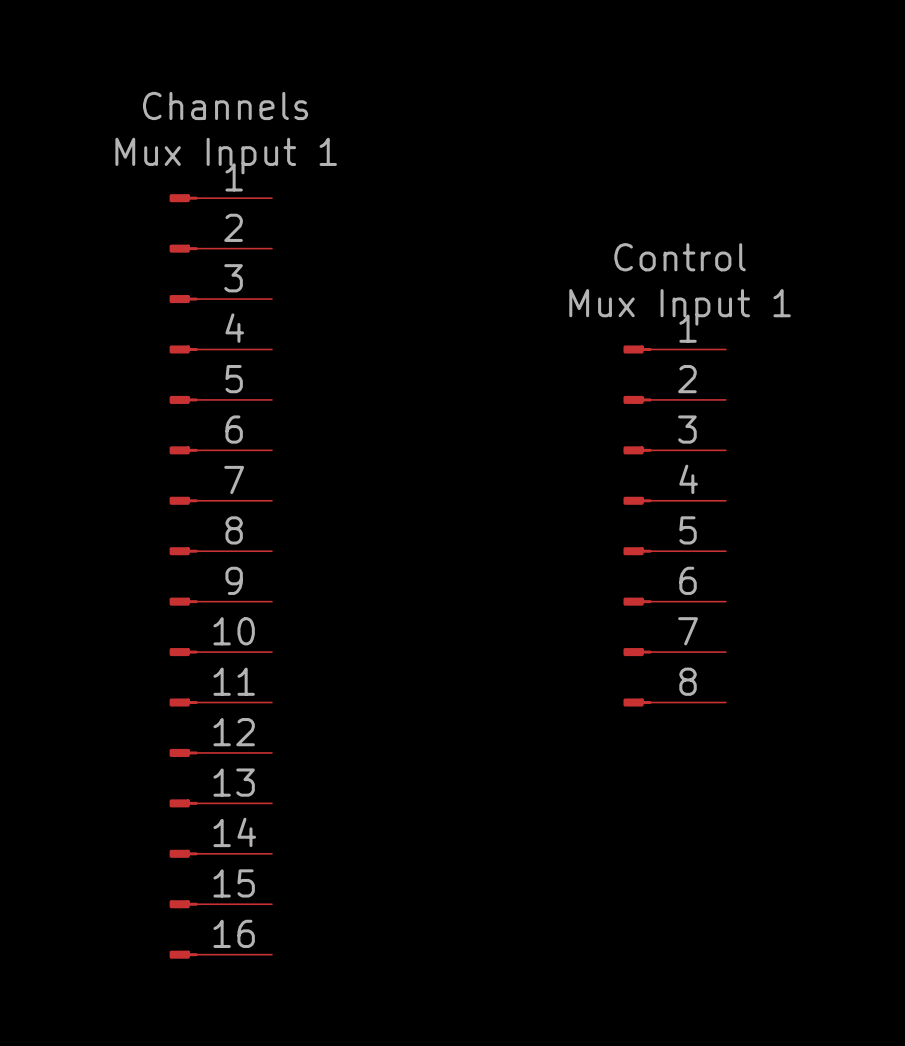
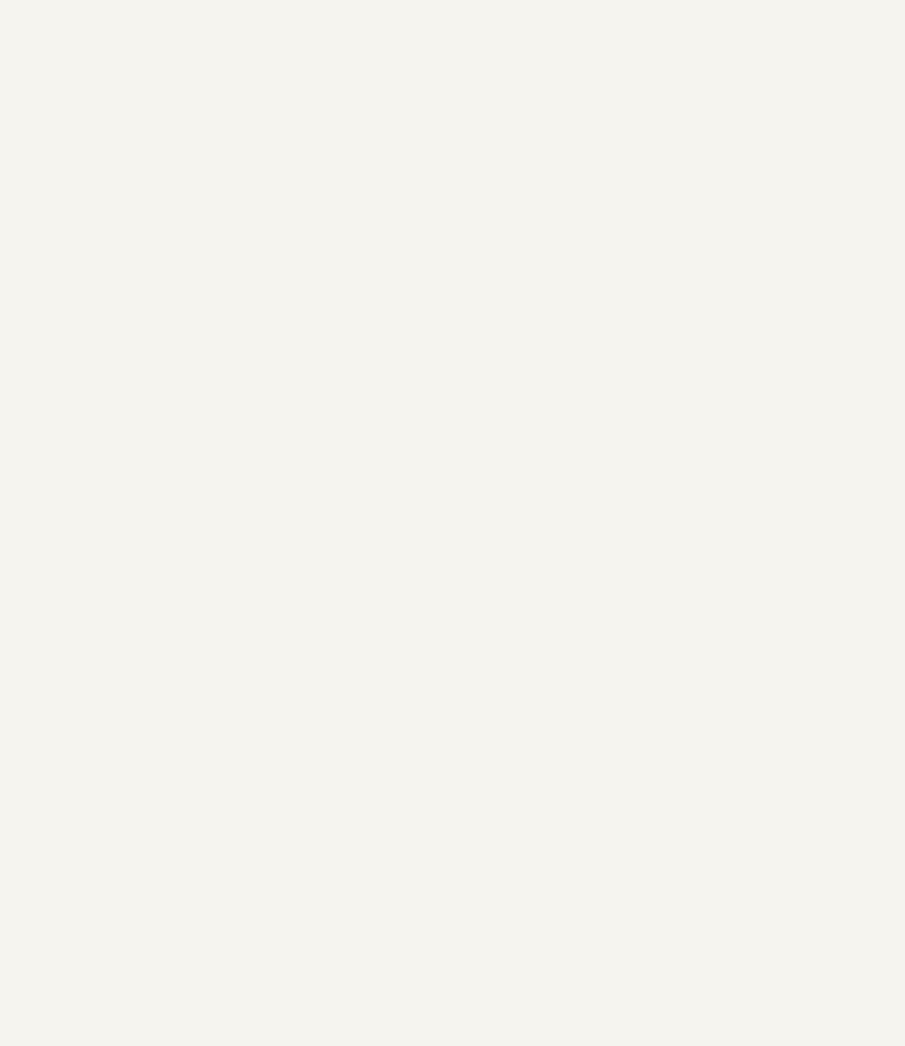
Control: Mux Input 1 (674, 526) -> none
Channels: Mux Input 1 (220, 576) -> none

